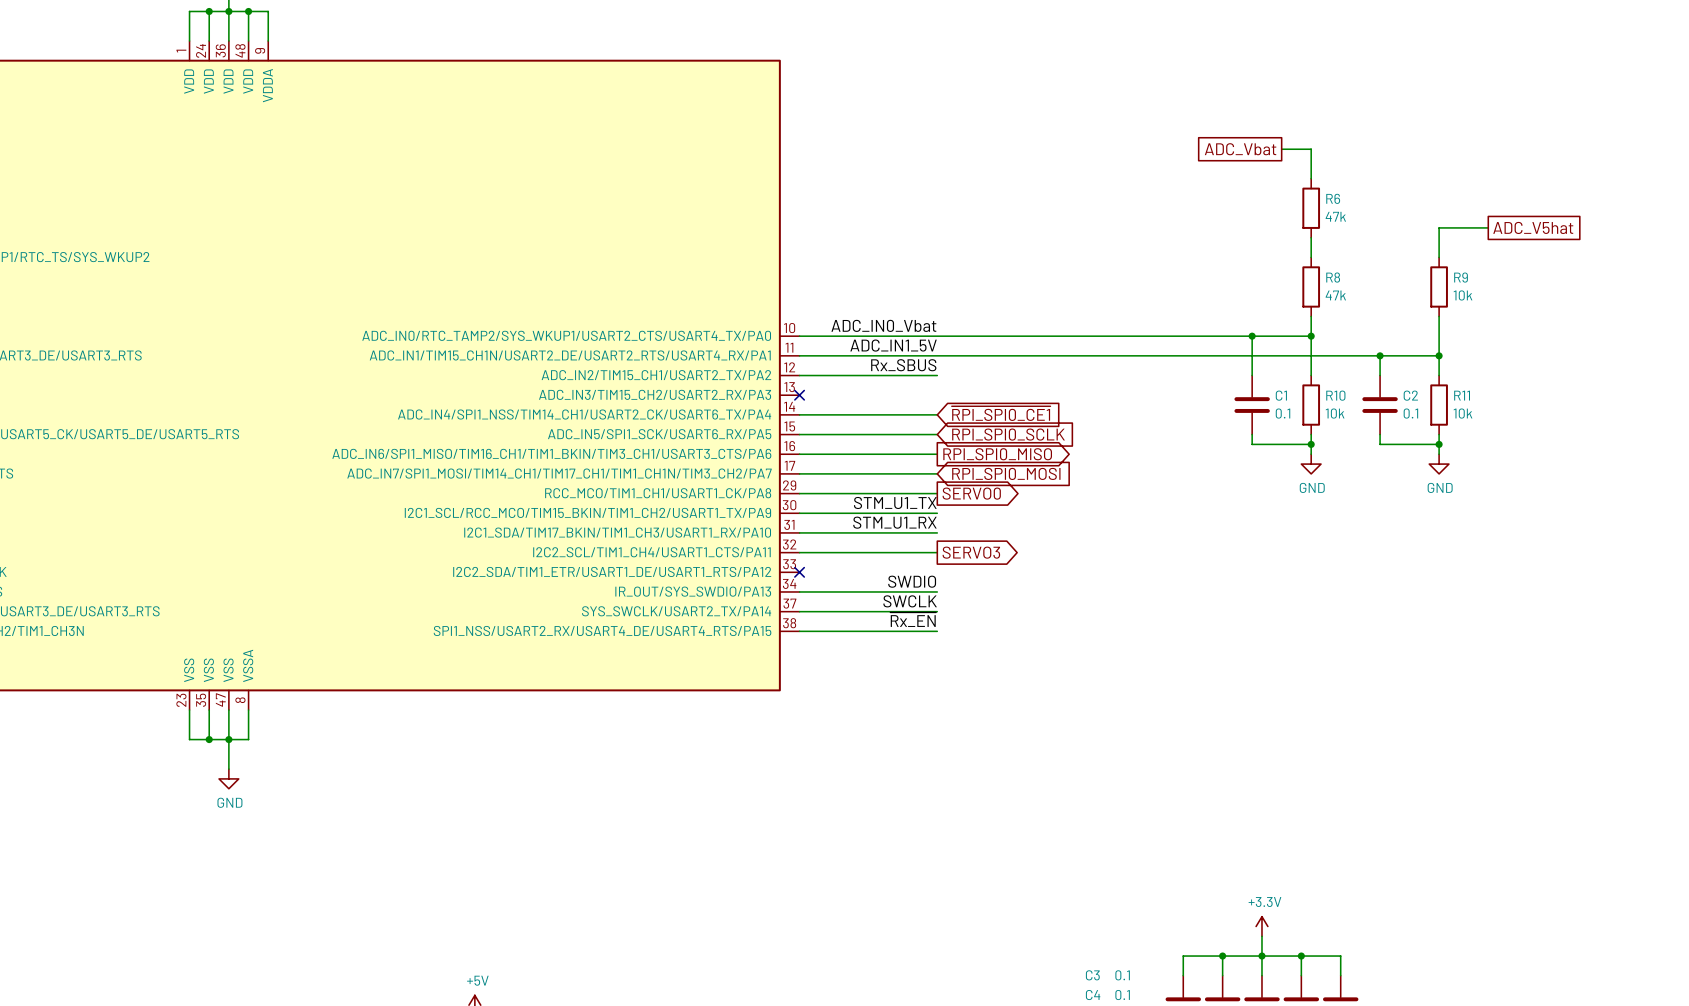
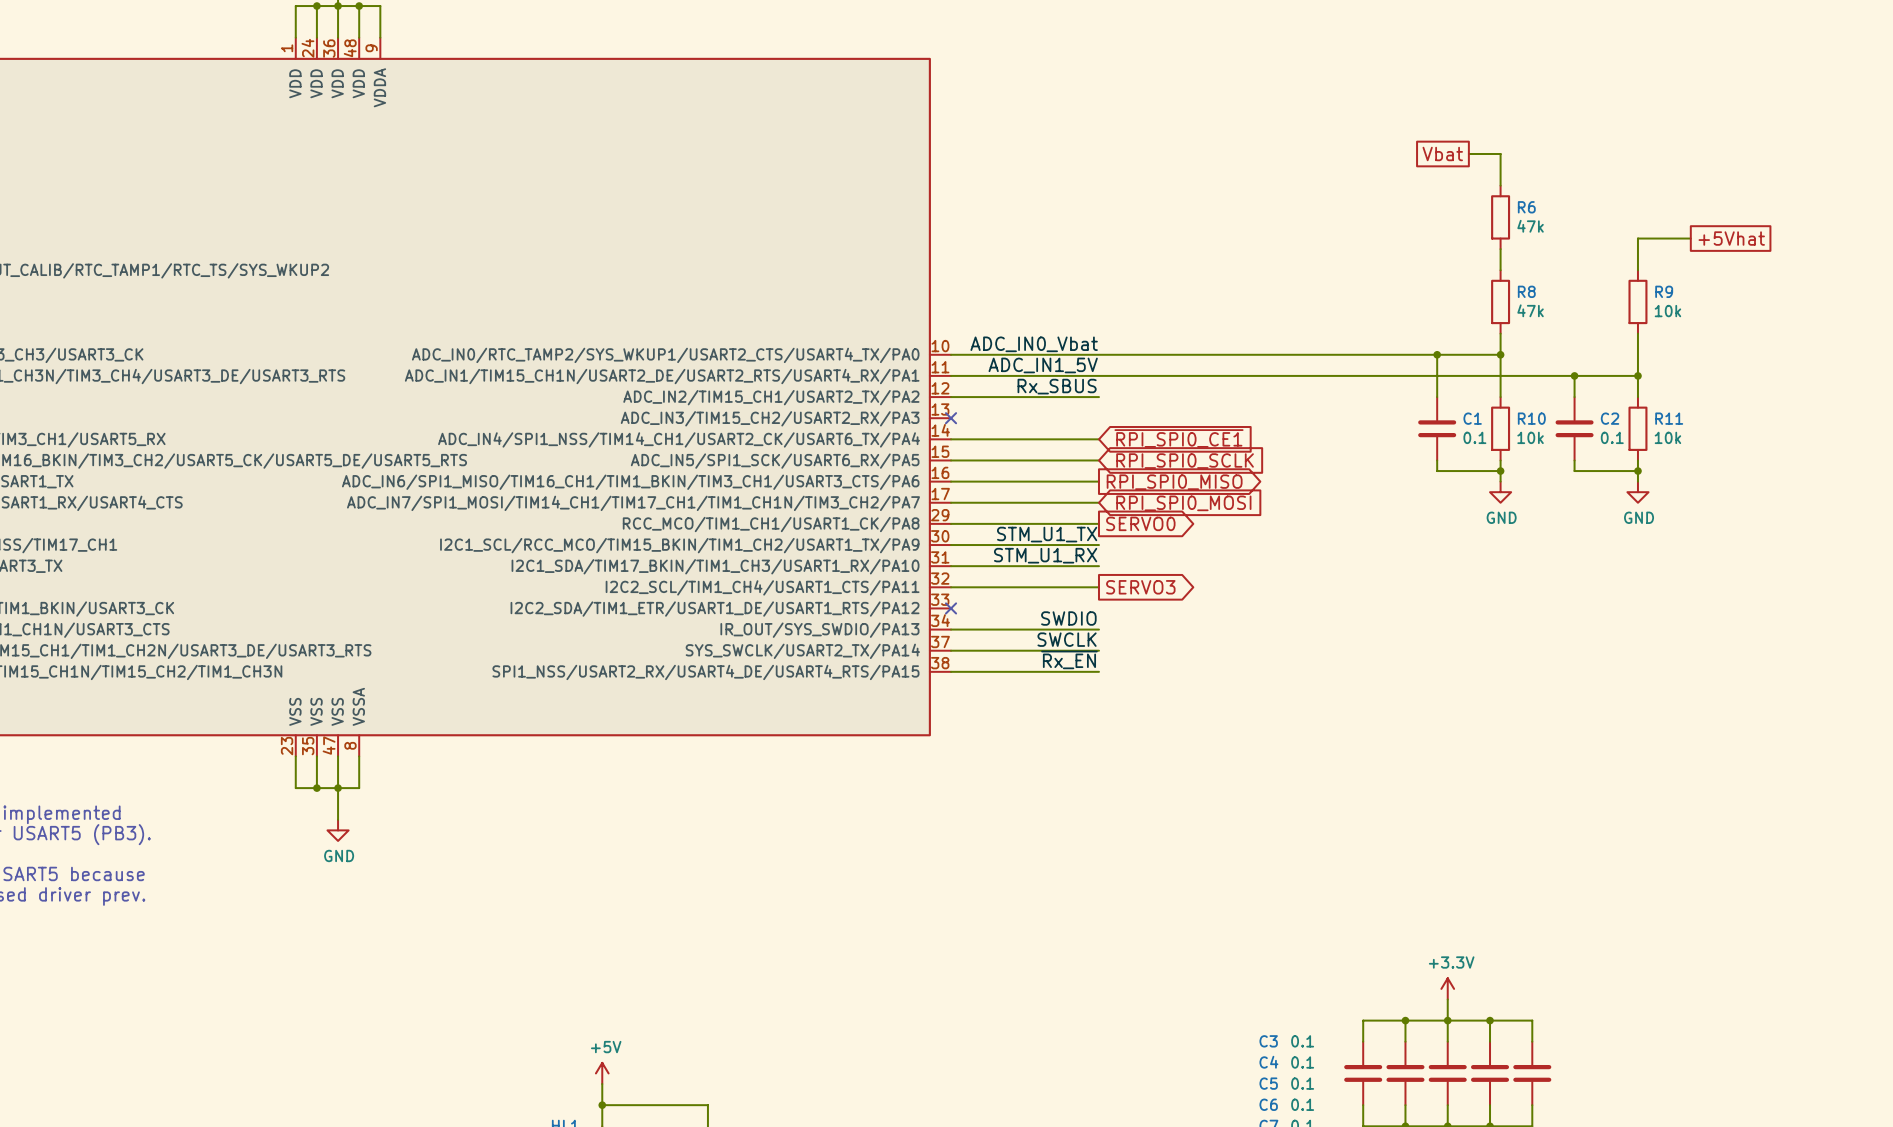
global label: ADC_Vbat (1240, 149) -> Vbat (1442, 153)
global label: ADC_V5hat (1533, 227) -> +5Vhat (1731, 238)

